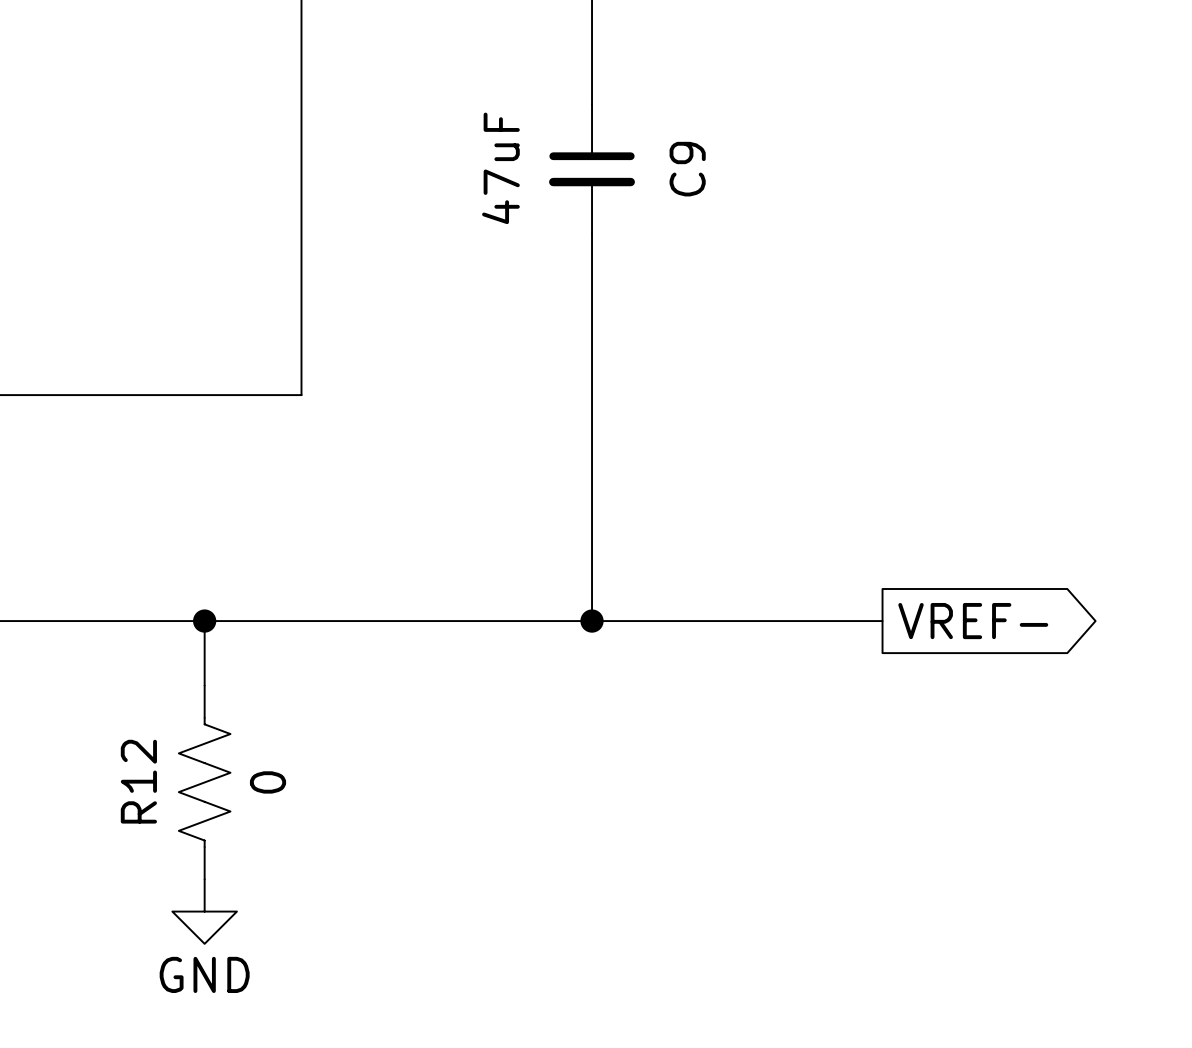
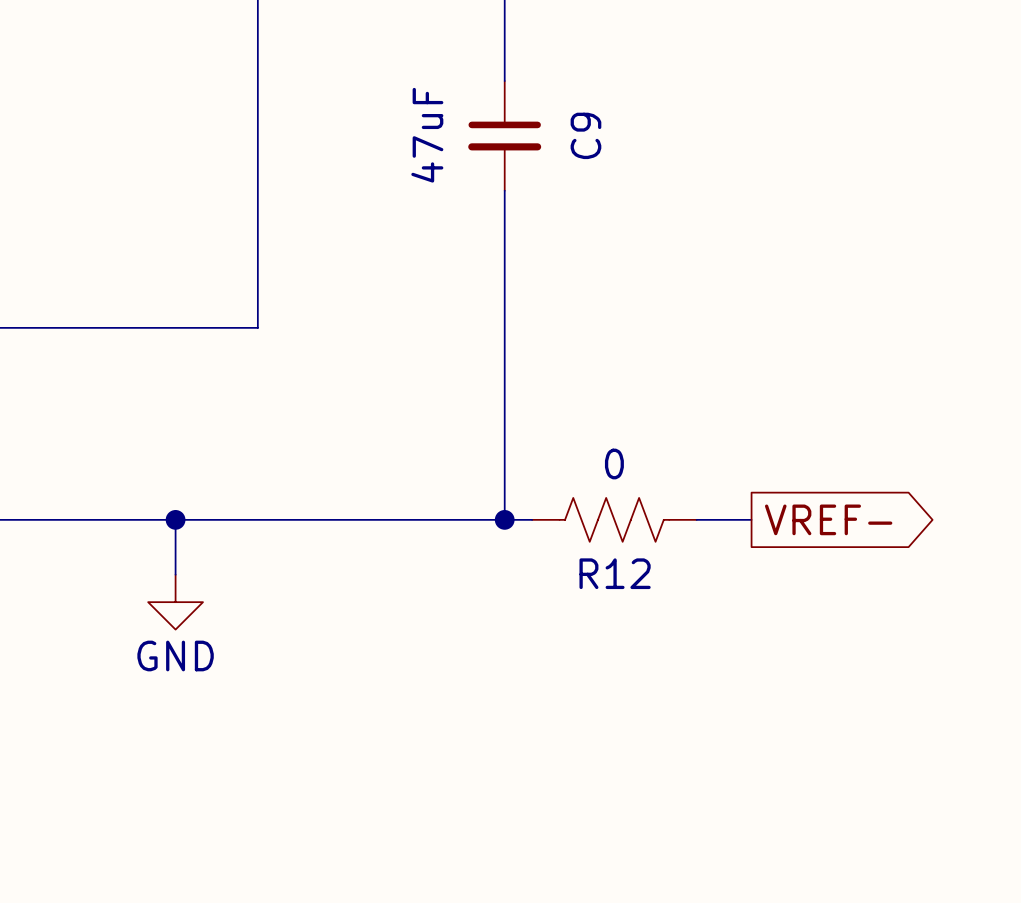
wire: (624, 621) (817, 621) -> none
R12 name position: R12 (138, 781) -> R12 (615, 573)
R12 rotation: 0° (204, 782) -> 90° clockwise (614, 519)
R12 position: (204, 782) -> (614, 519)
R12 value position: 0 (268, 782) -> 0 (614, 463)
power symbol position: GND (204, 911) -> GND (175, 602)

